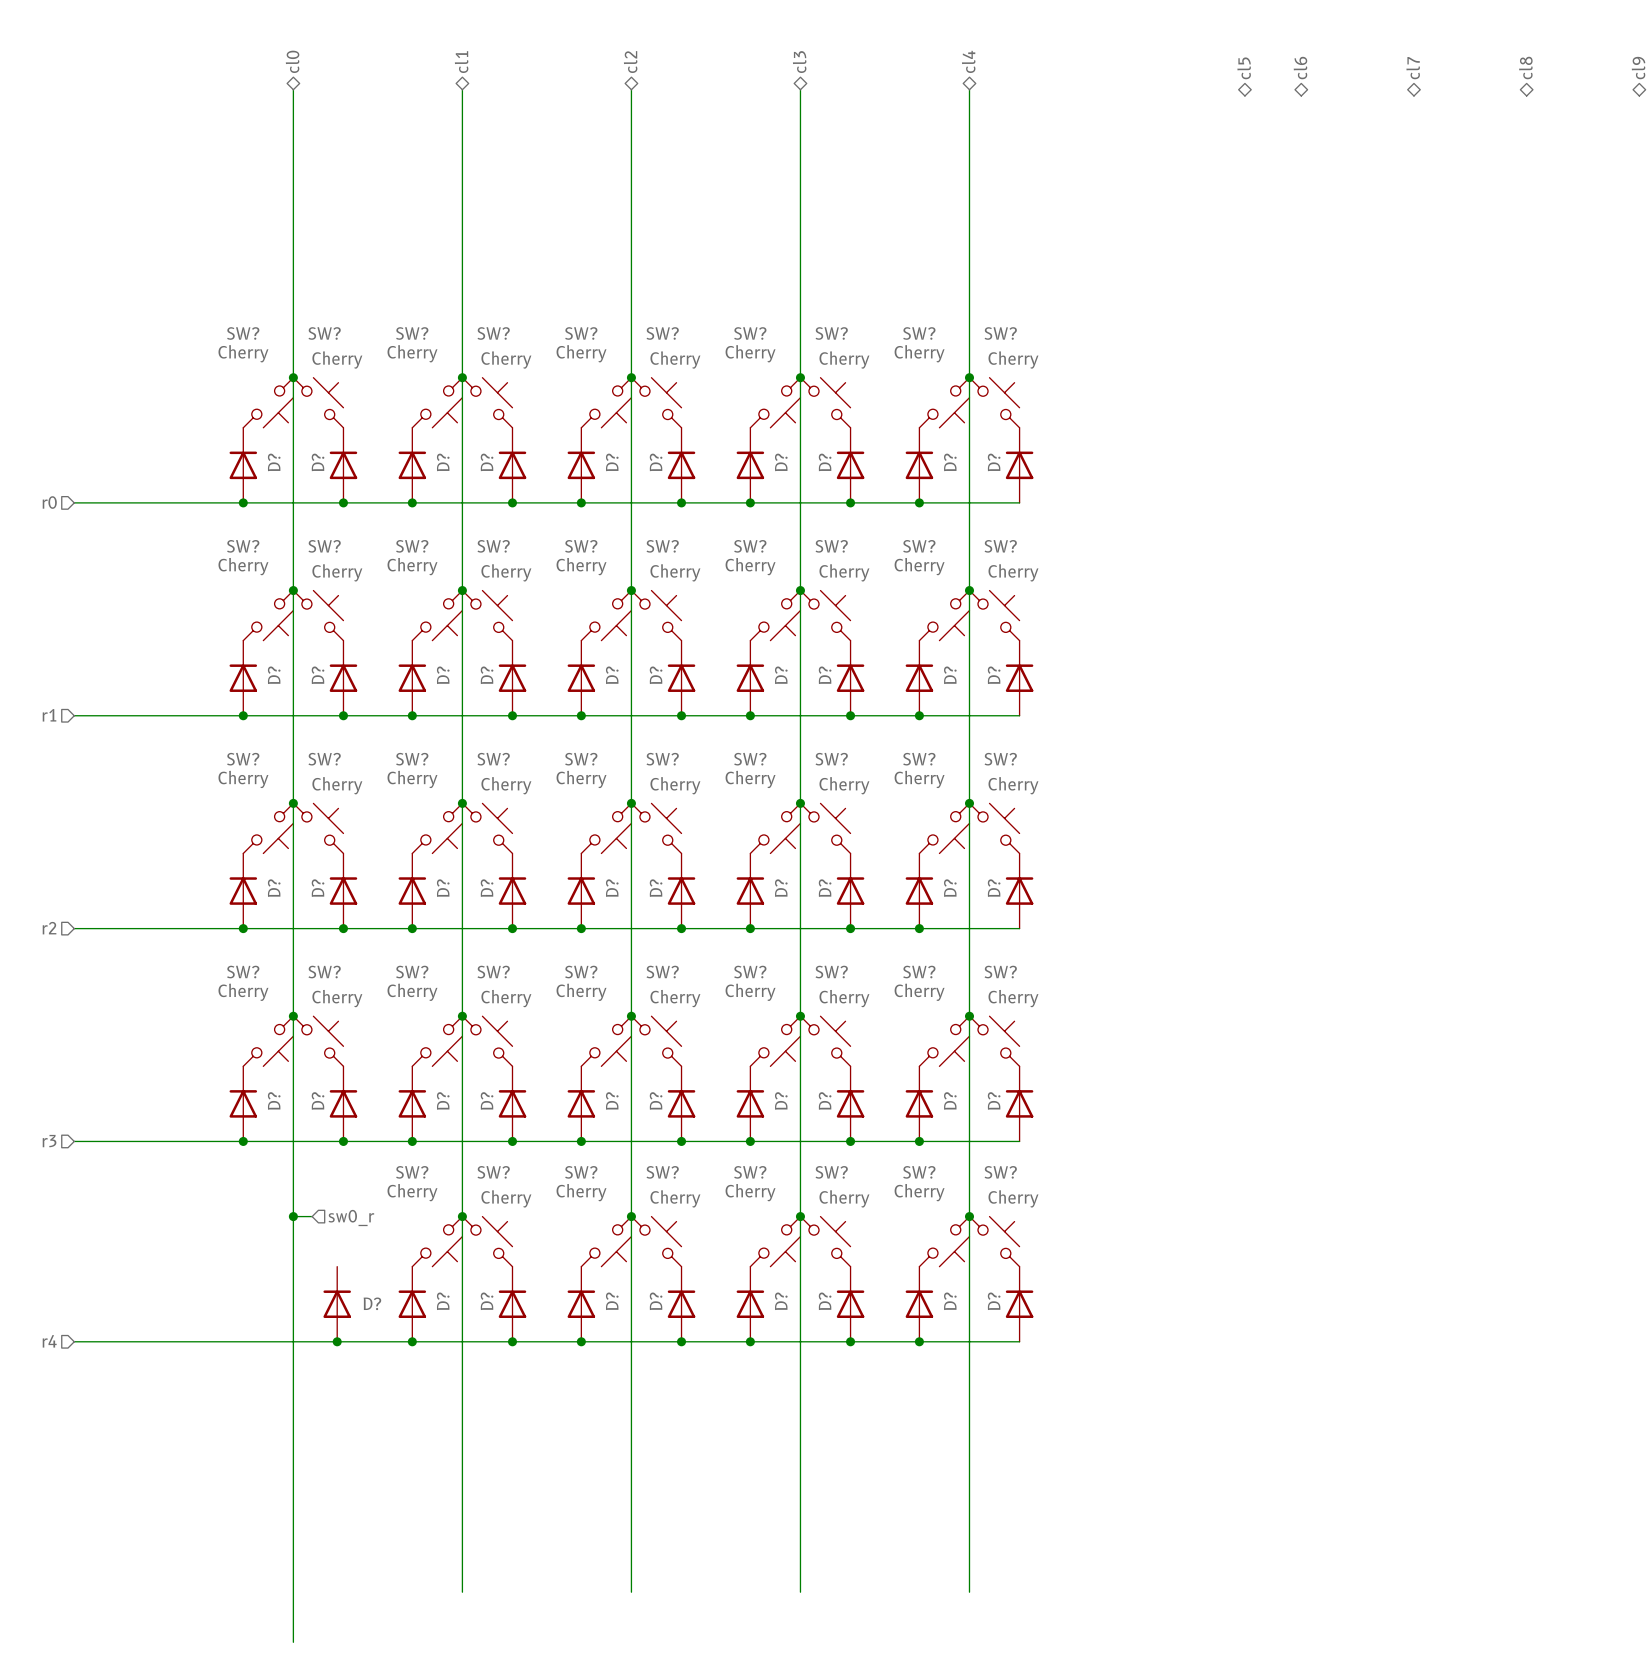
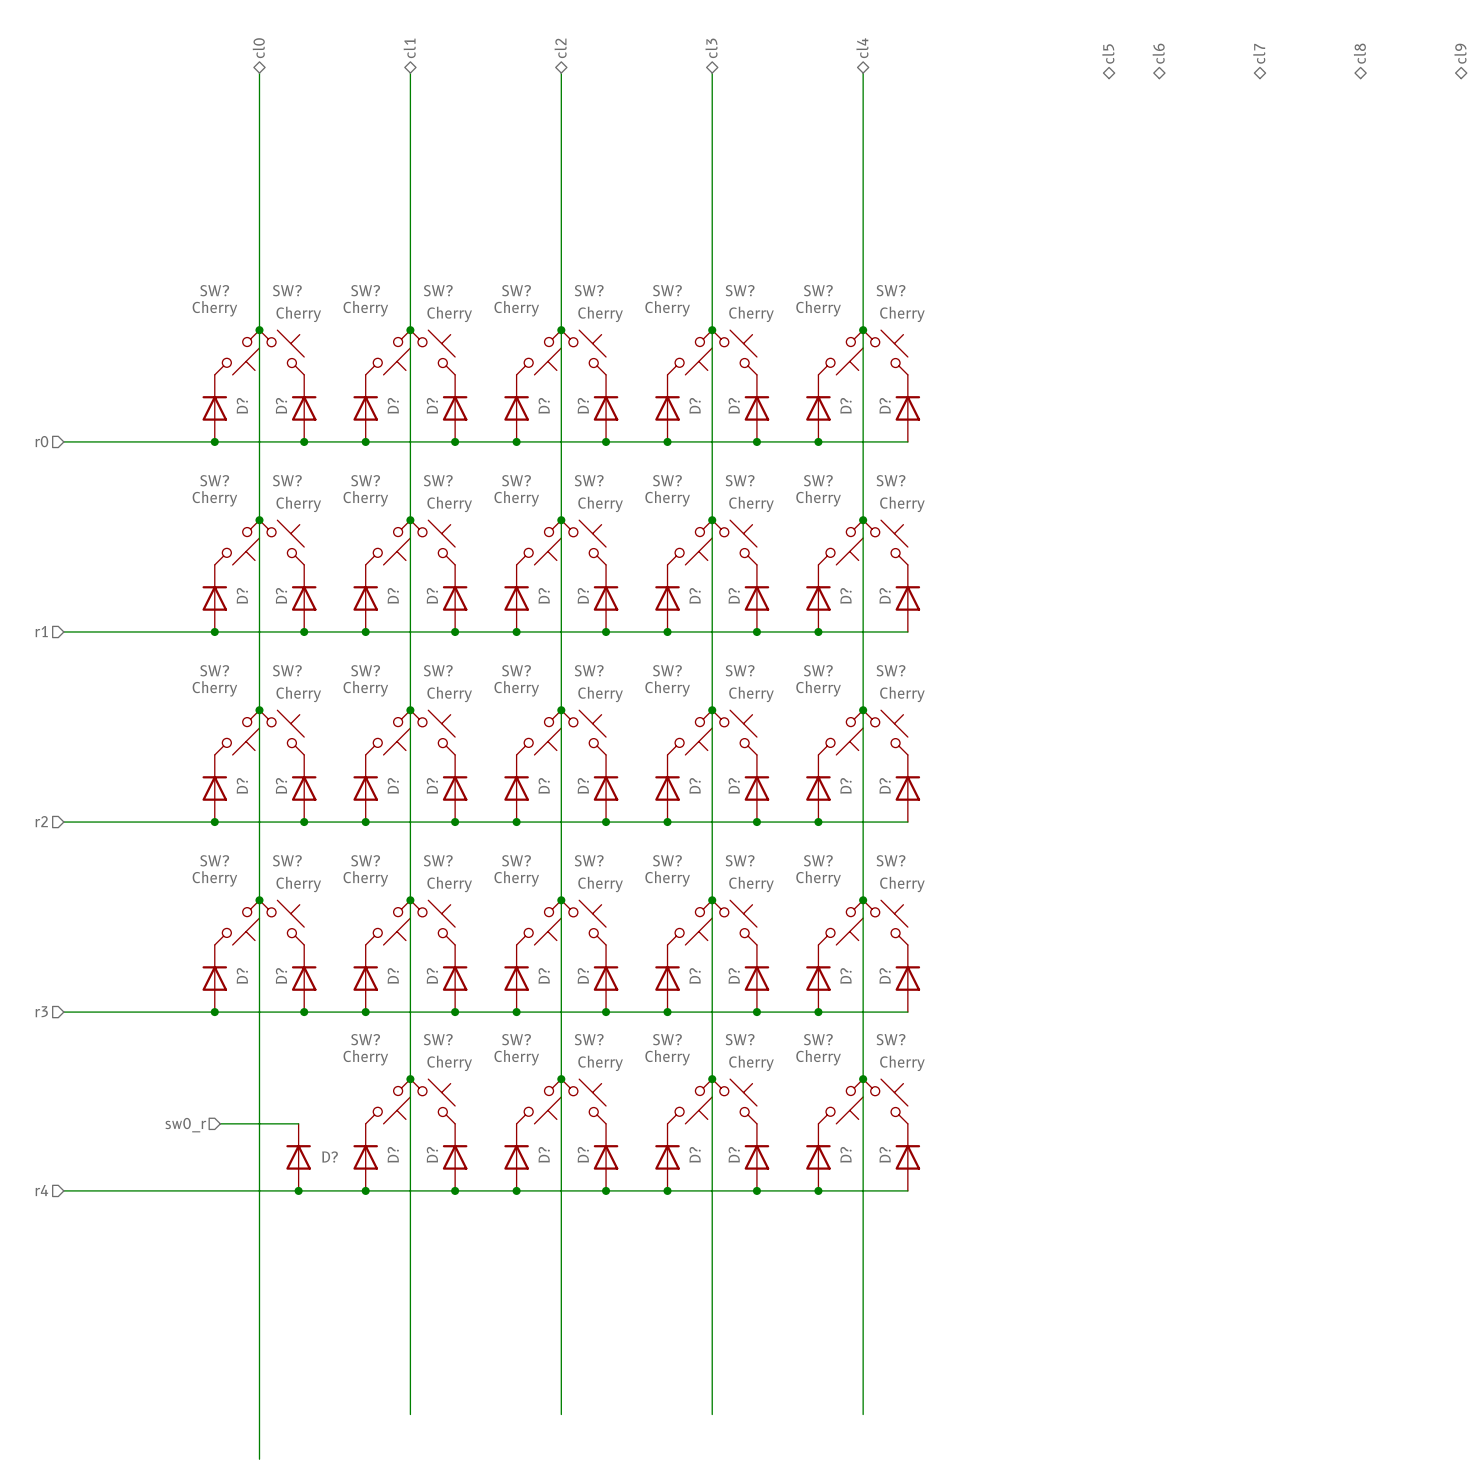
wire: (293, 1216) (312, 1216) -> none
junction: (293, 1216) -> none
hierarchical label rotation: 0° (351, 1218) -> 180° (185, 1125)
hierarchical label position: sw0_r (351, 1218) -> sw0_r (185, 1125)
wire: none -> (220, 1123) (298, 1123)

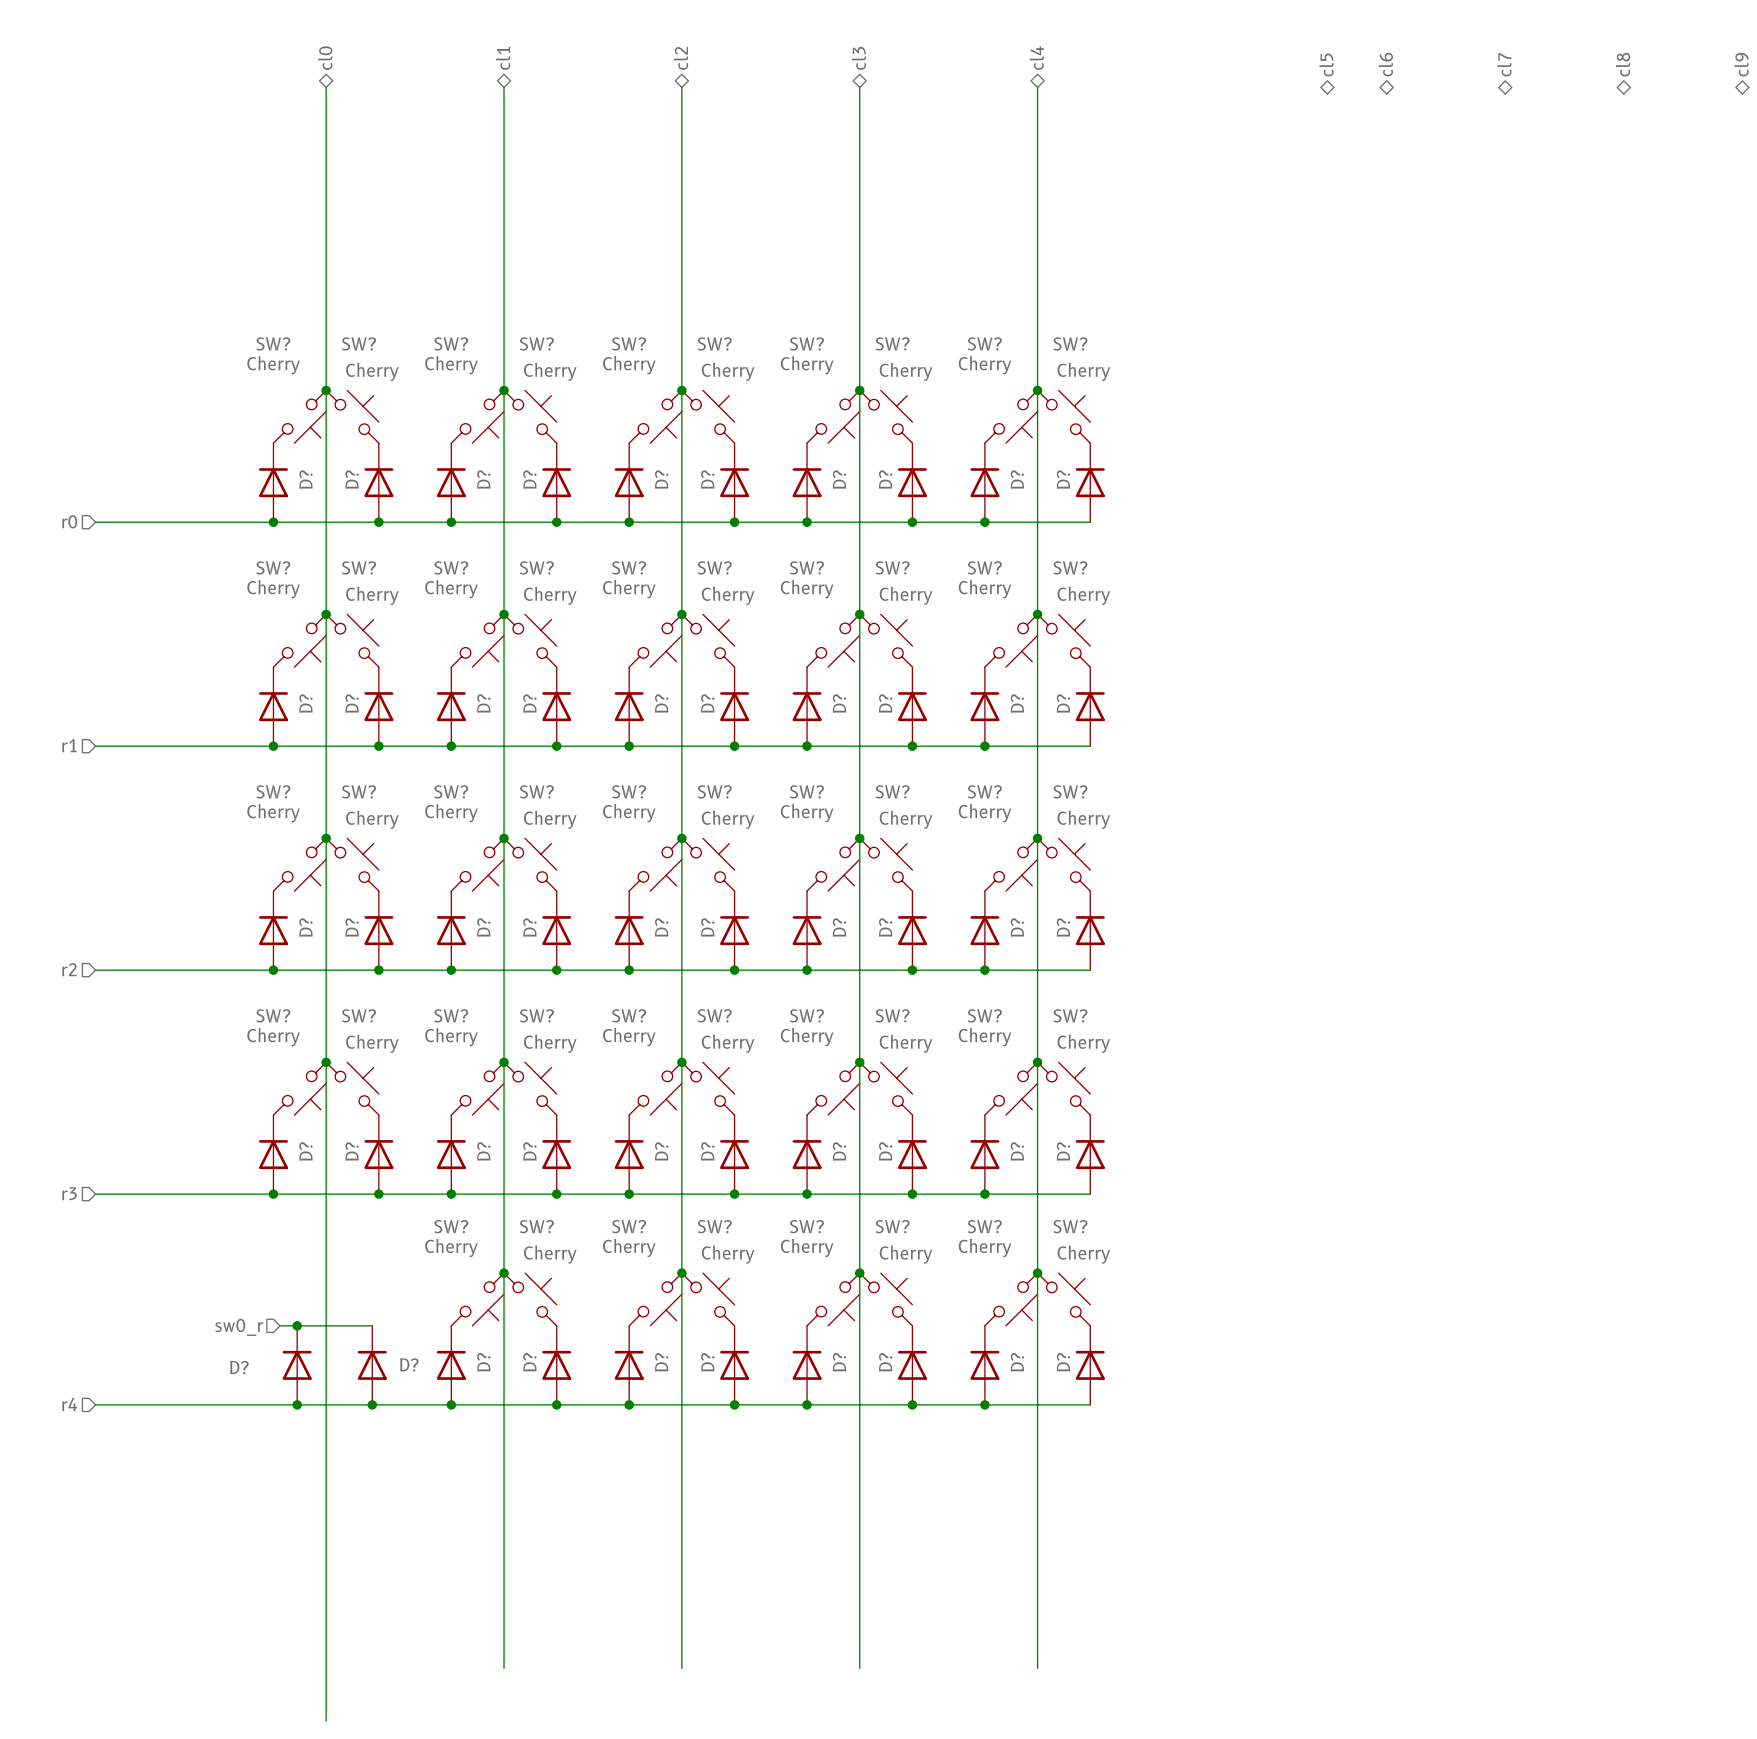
junction: none -> (297, 1325)
D?: none -> (297, 1365)
junction: none -> (297, 1404)

